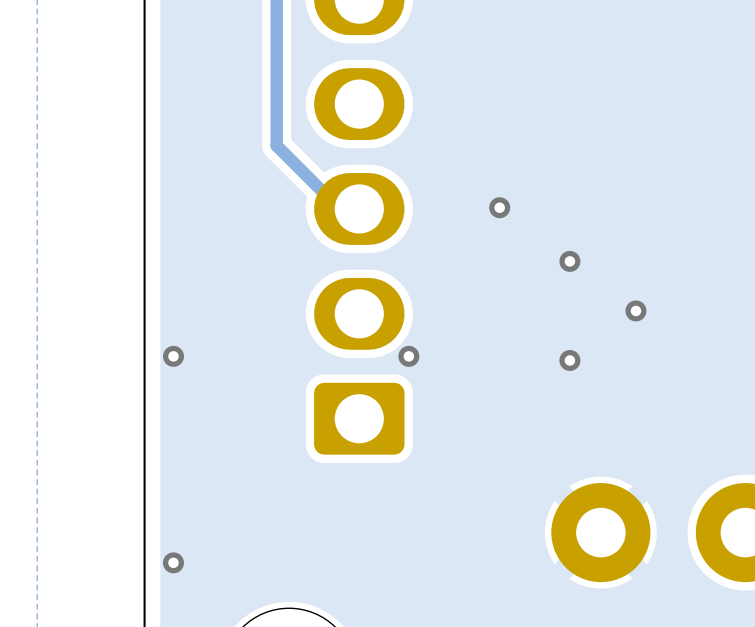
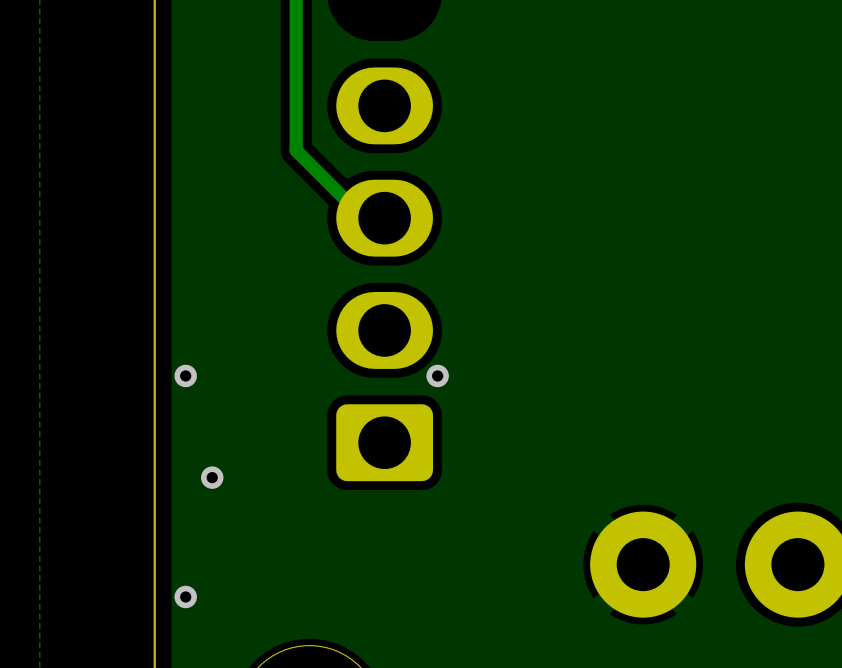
via: (499, 207) -> none
via: (569, 261) -> none
via: (635, 310) -> none
via: (569, 360) -> none
via: none -> (212, 477)

